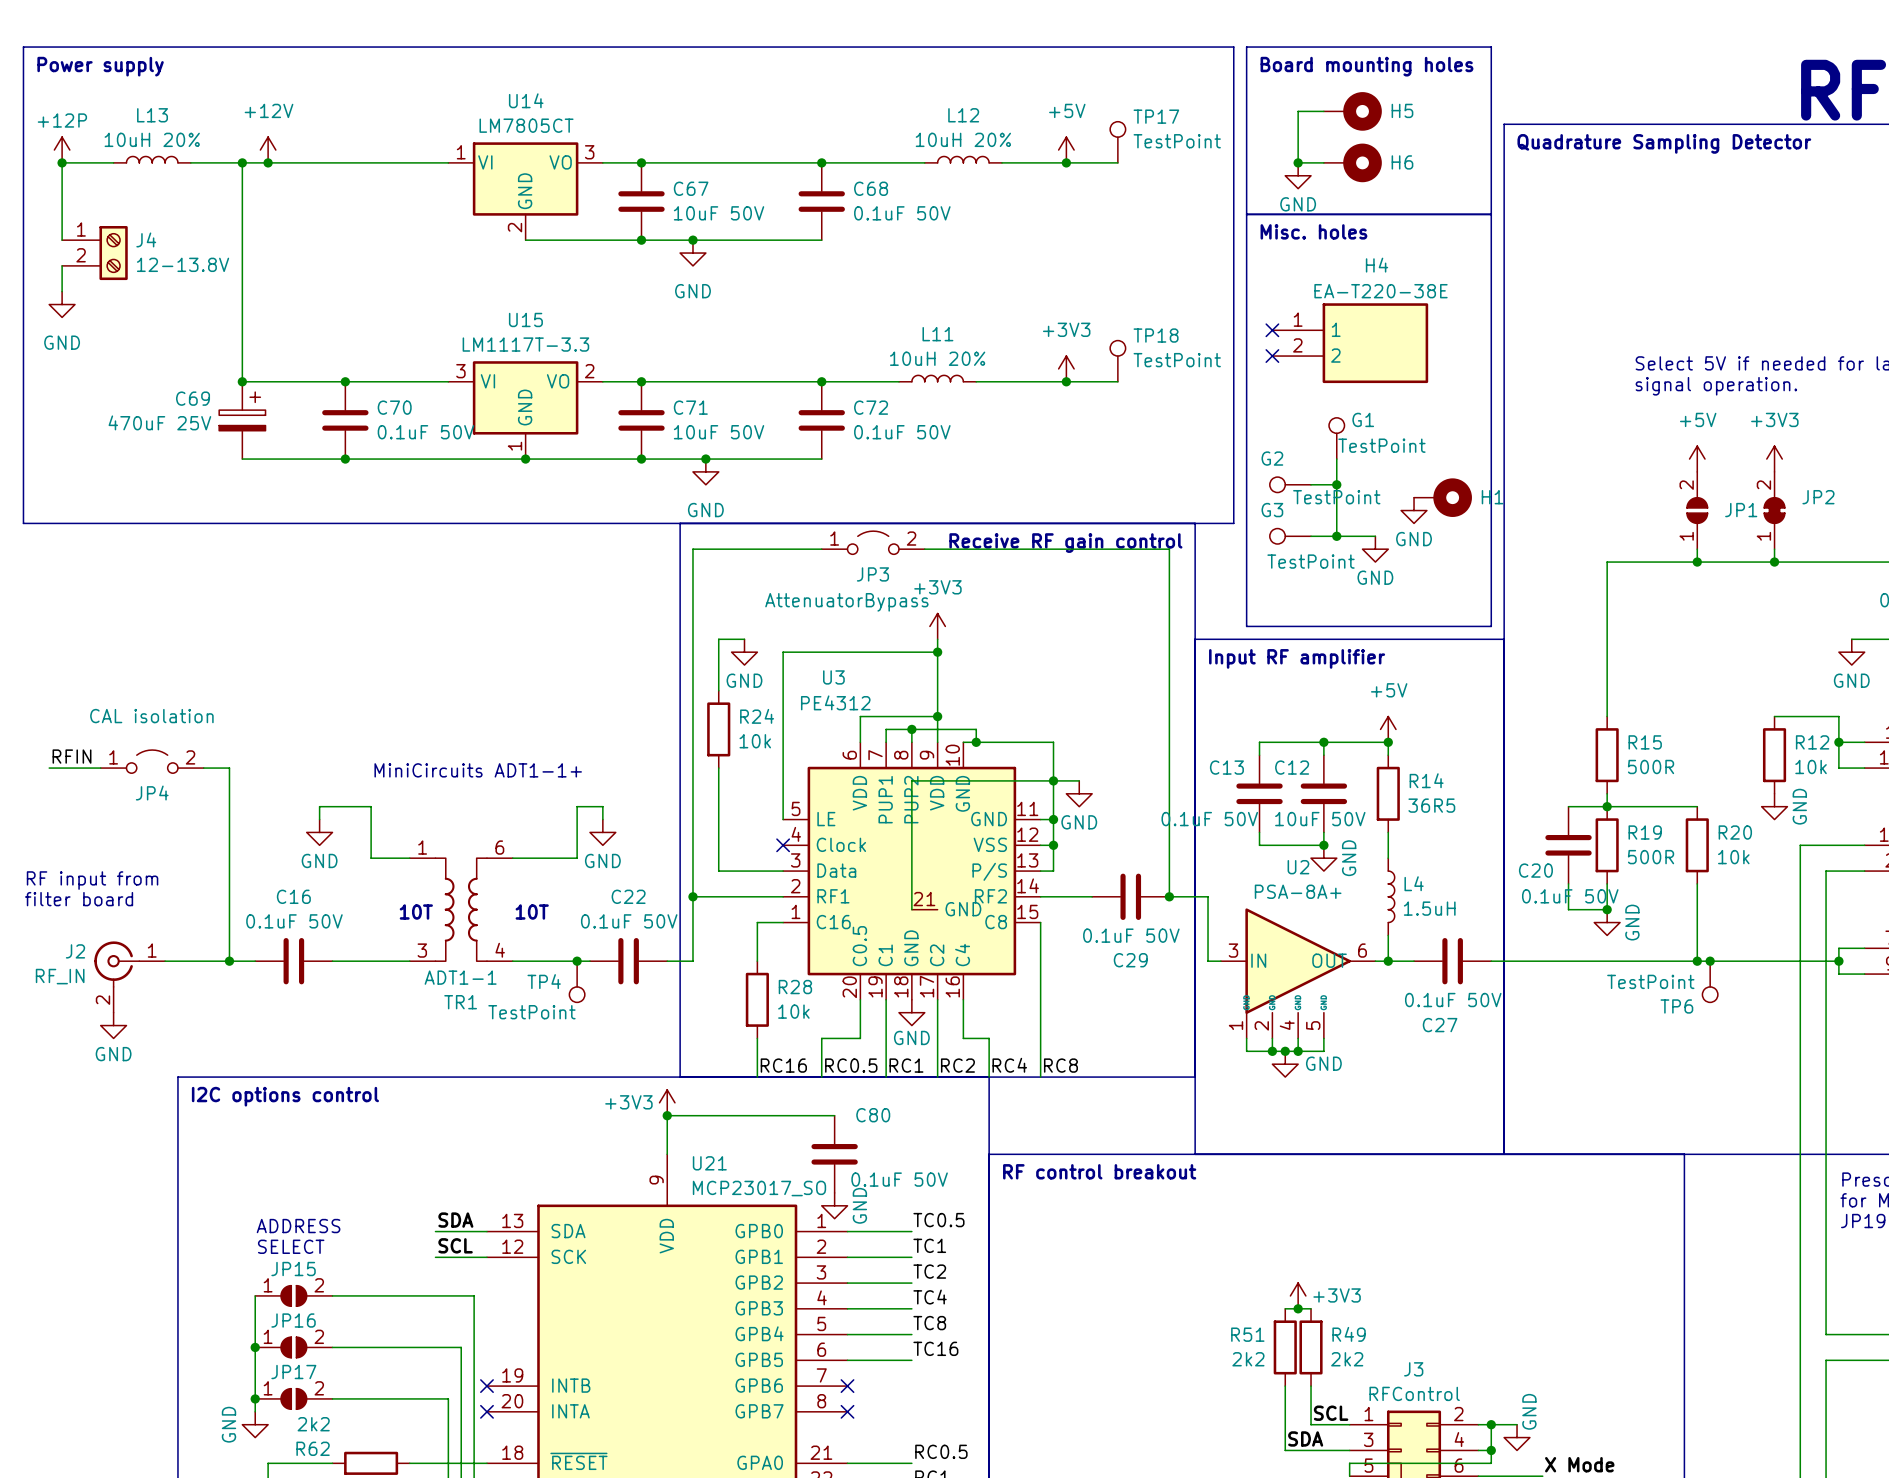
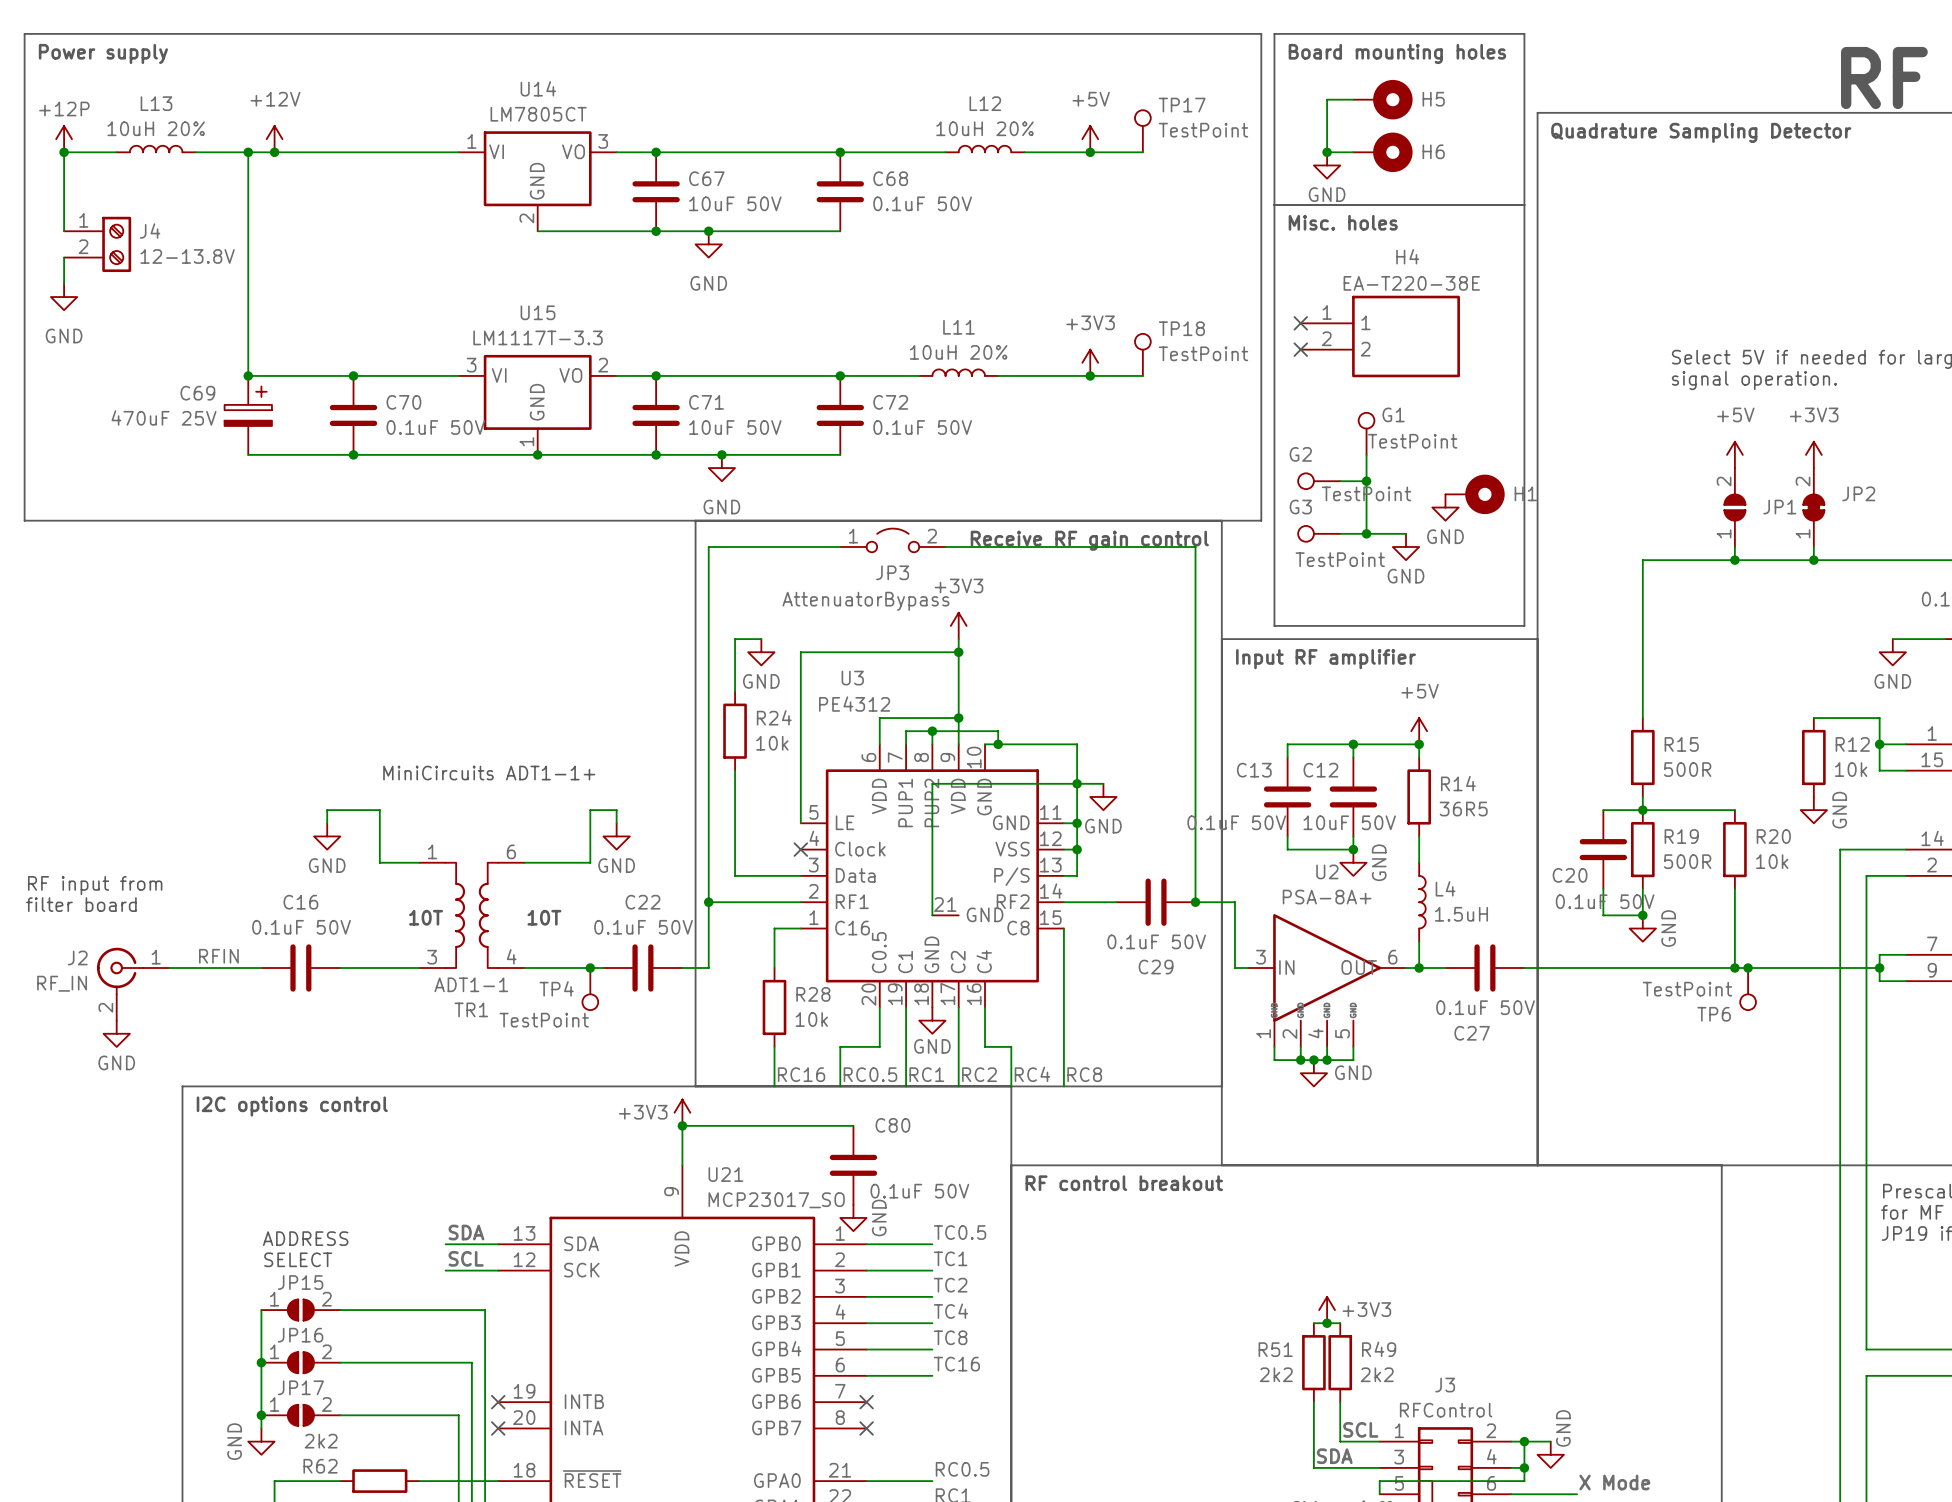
label position: RFIN (72, 756) -> RFIN (218, 956)
JP4: CAL isolation (152, 761) -> none
wire: (49, 768) (100, 768) -> none
wire: (203, 768) (229, 768) (229, 961) -> none
junction: (229, 961) -> none

